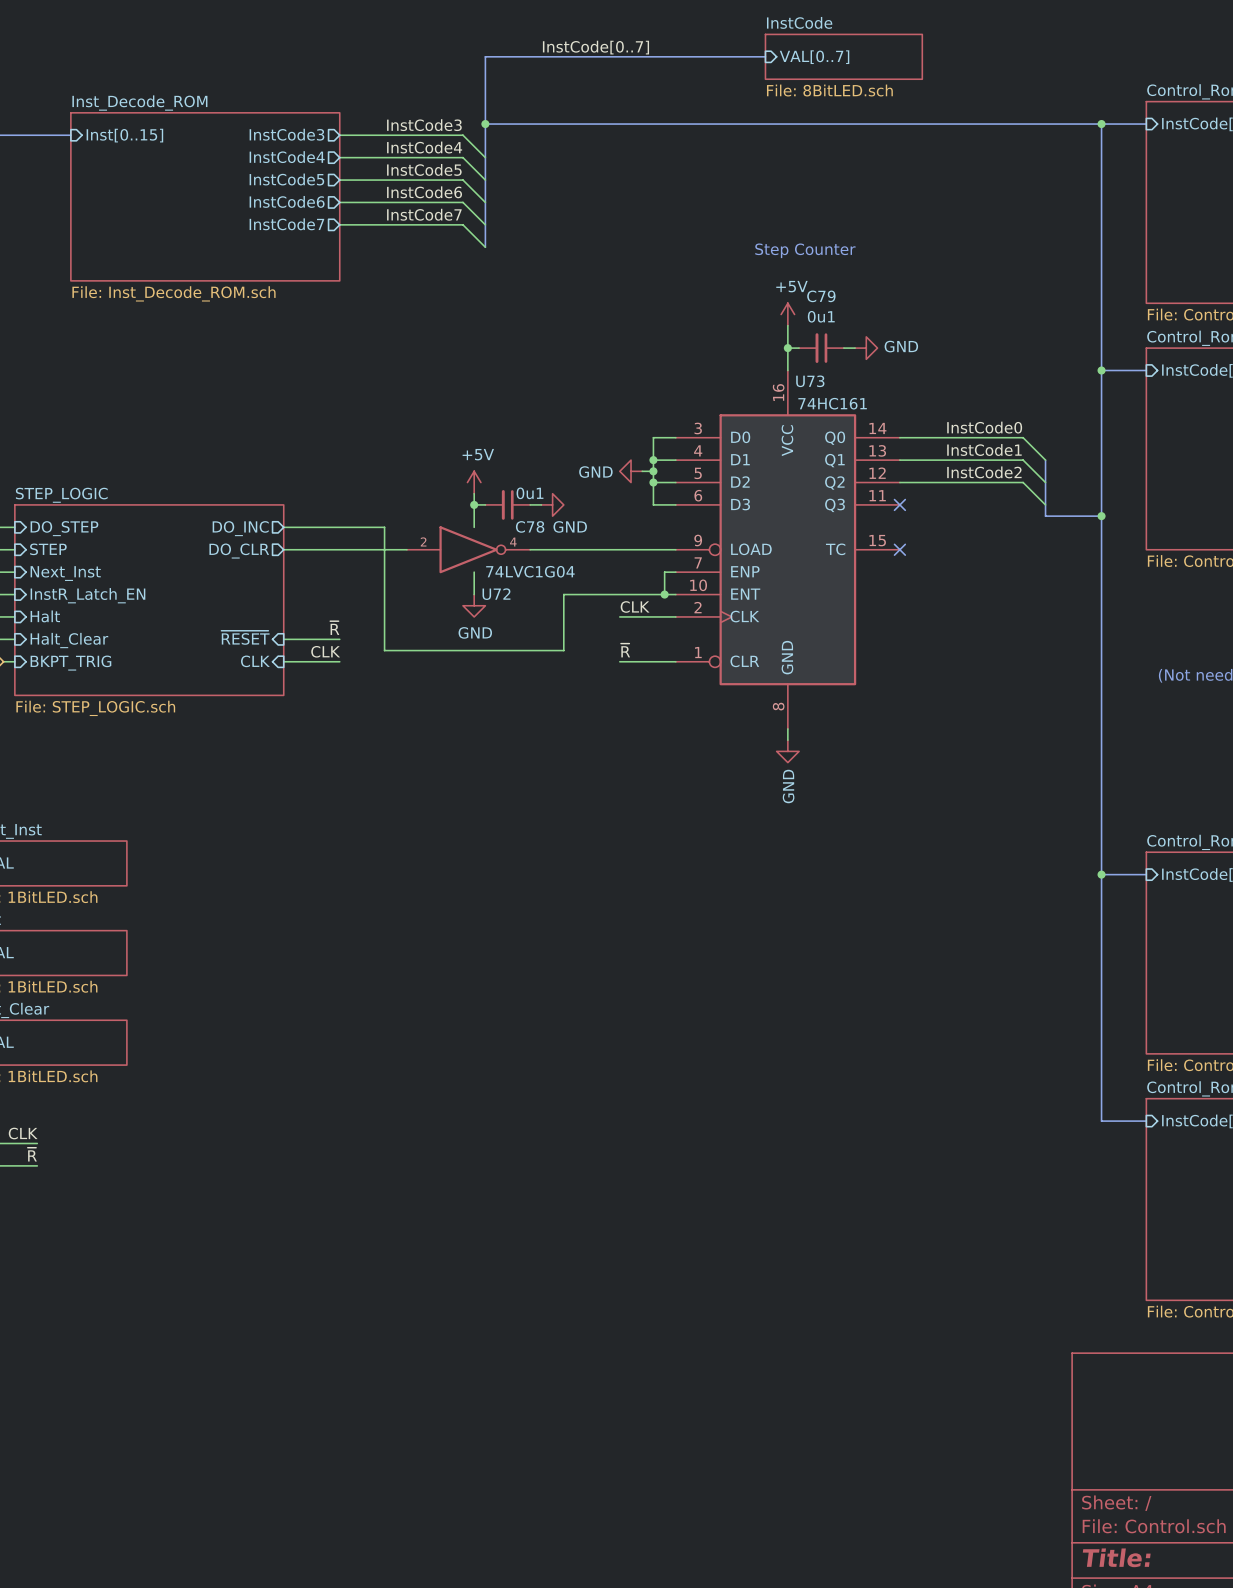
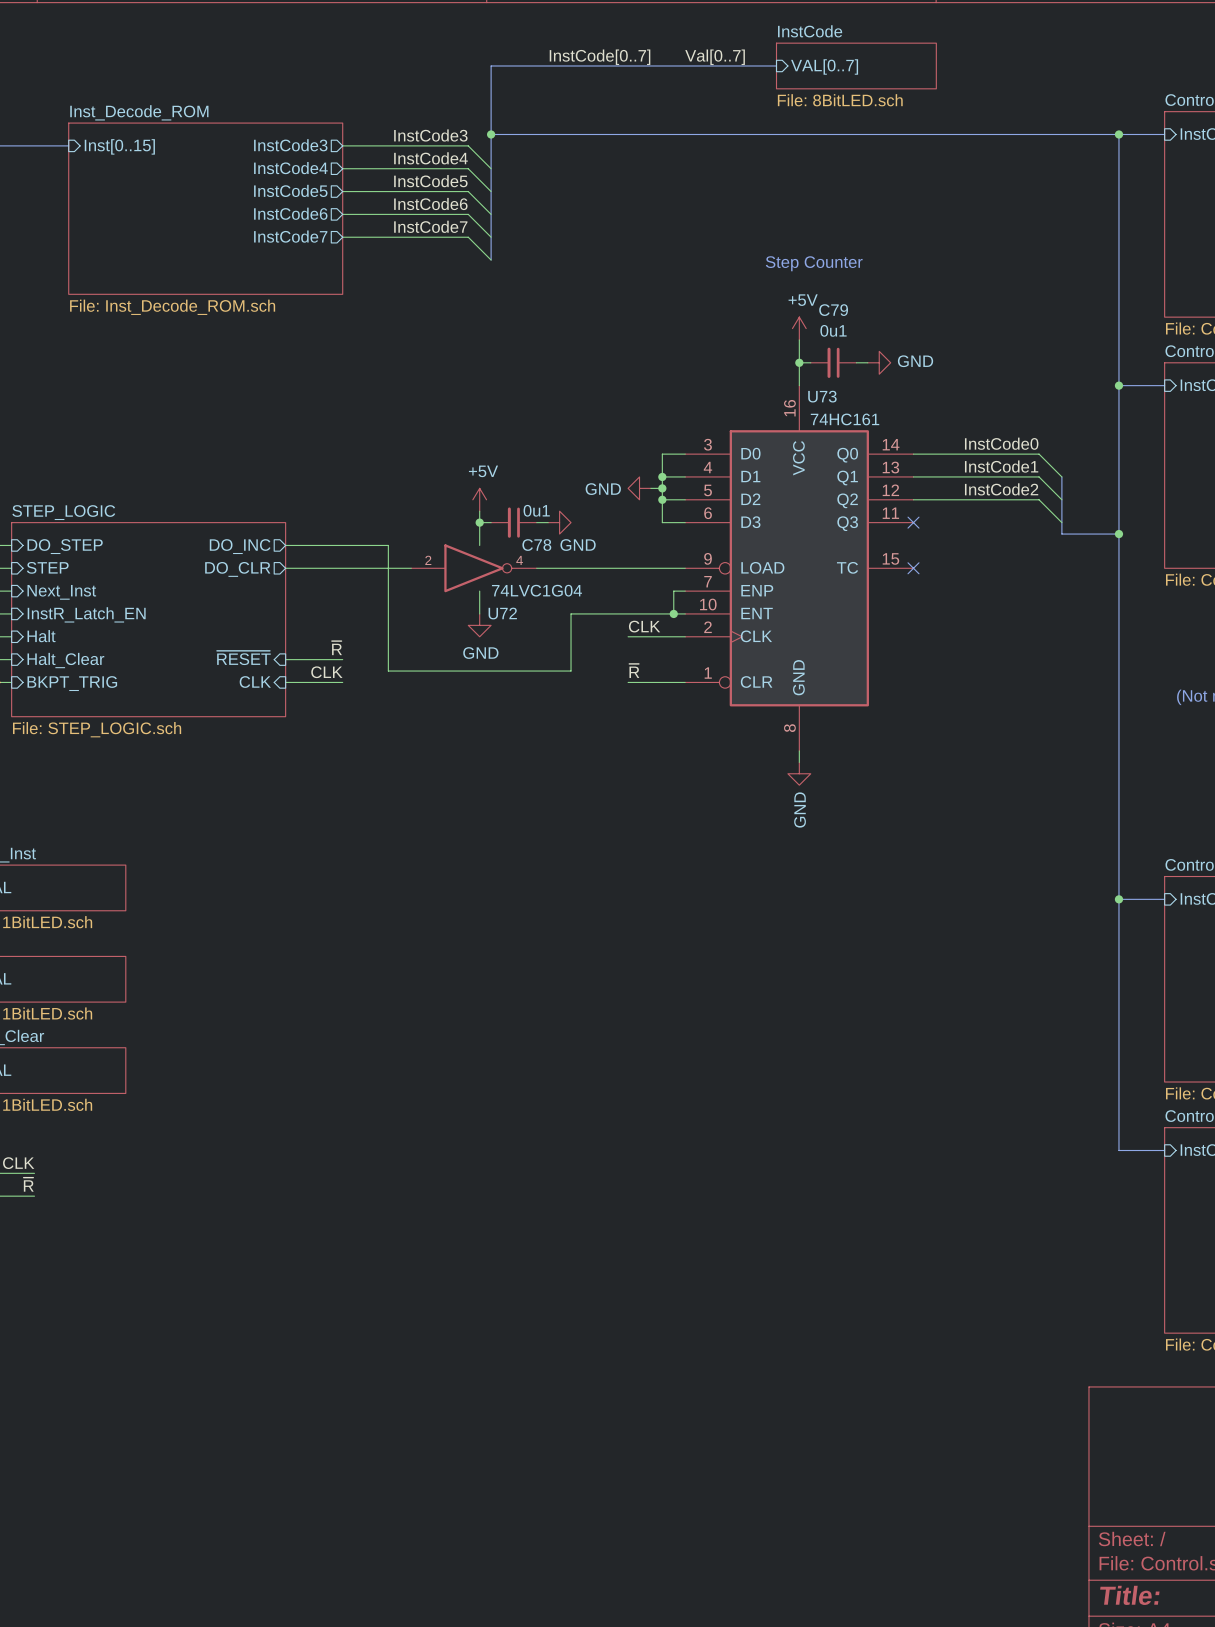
label: none -> Val[0..7] (715, 57)

